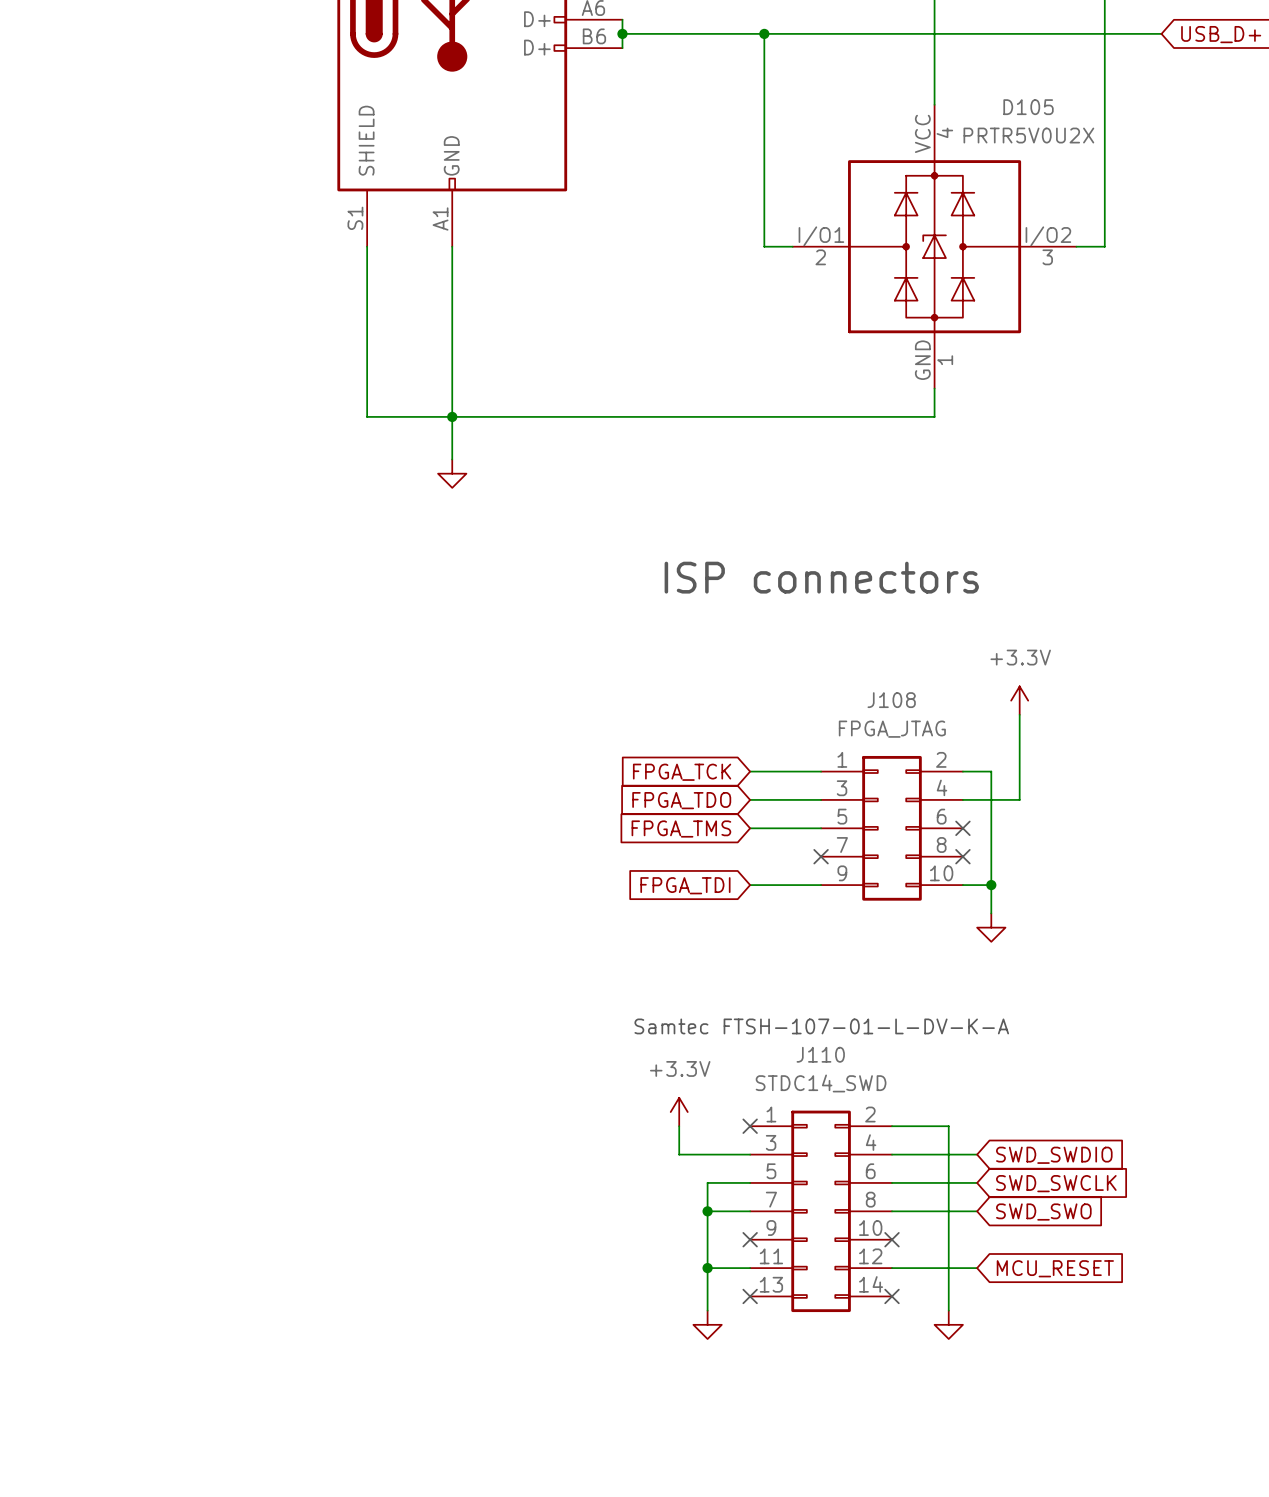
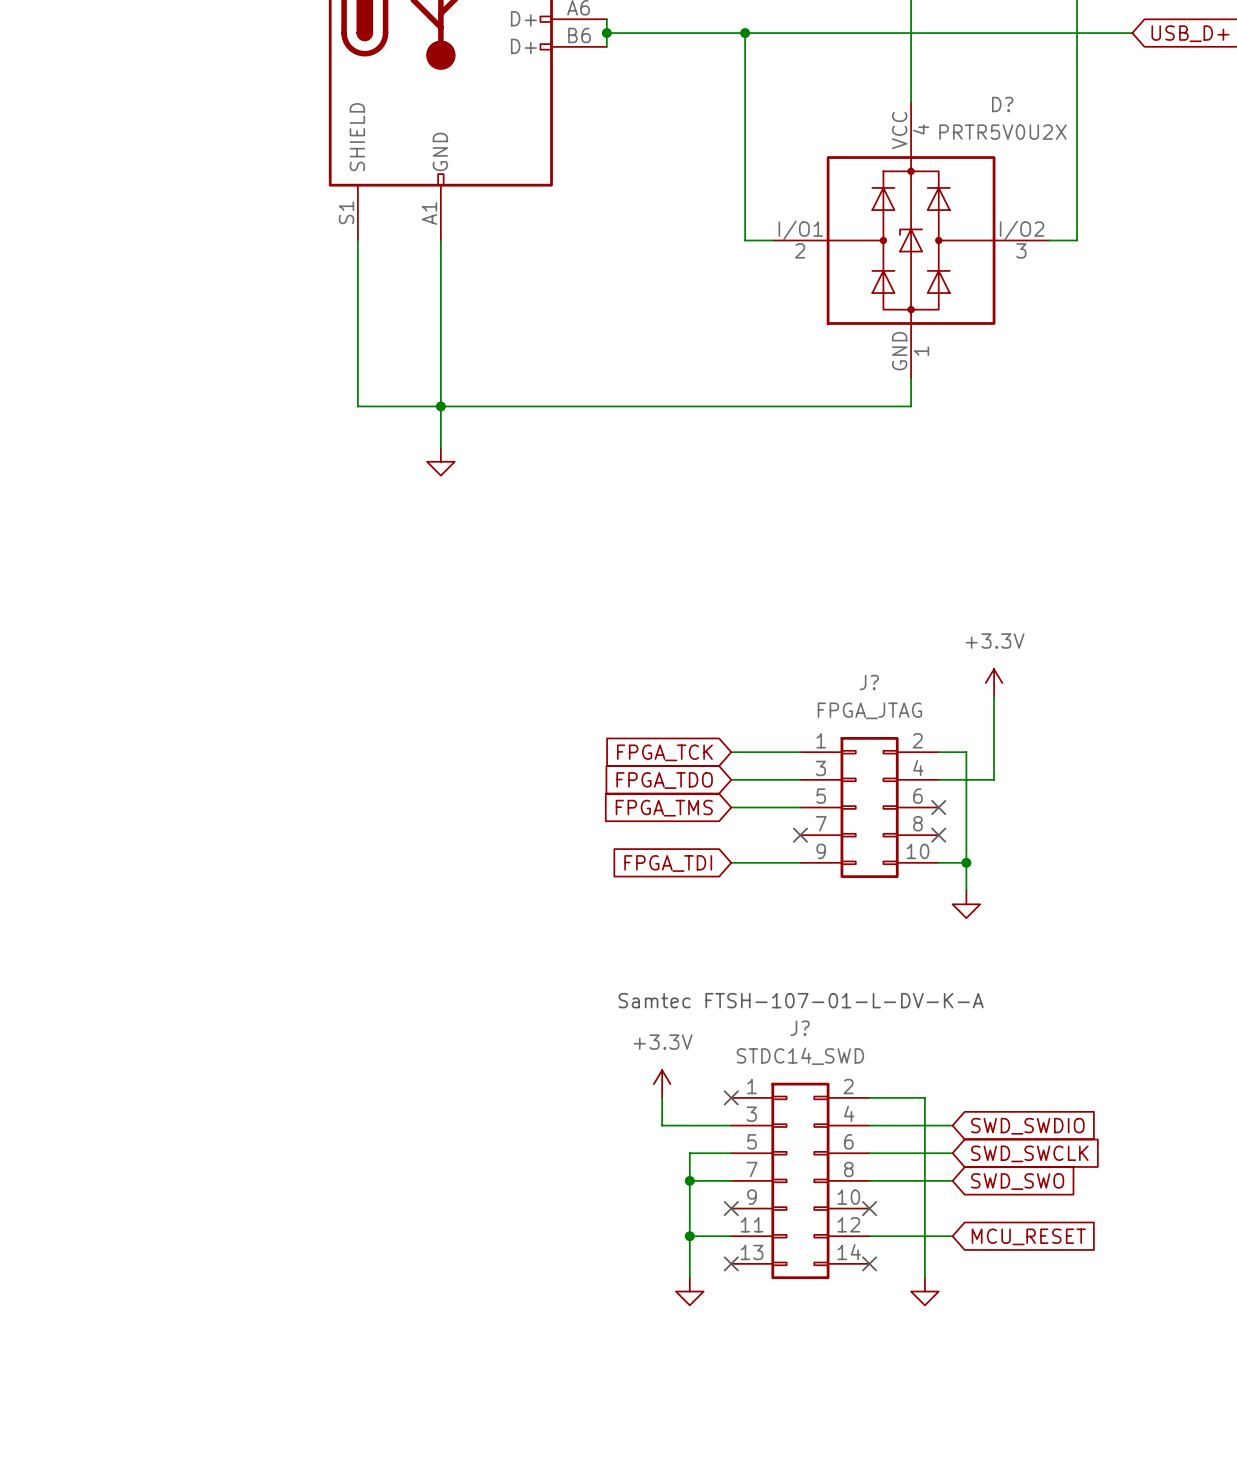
D105 name: D105 (1028, 107) -> D? (1002, 104)
text: ISP connectors (821, 577) -> none
J108 name: J108 (891, 700) -> J? (869, 682)
J110 name: J110 (820, 1054) -> J? (800, 1028)

